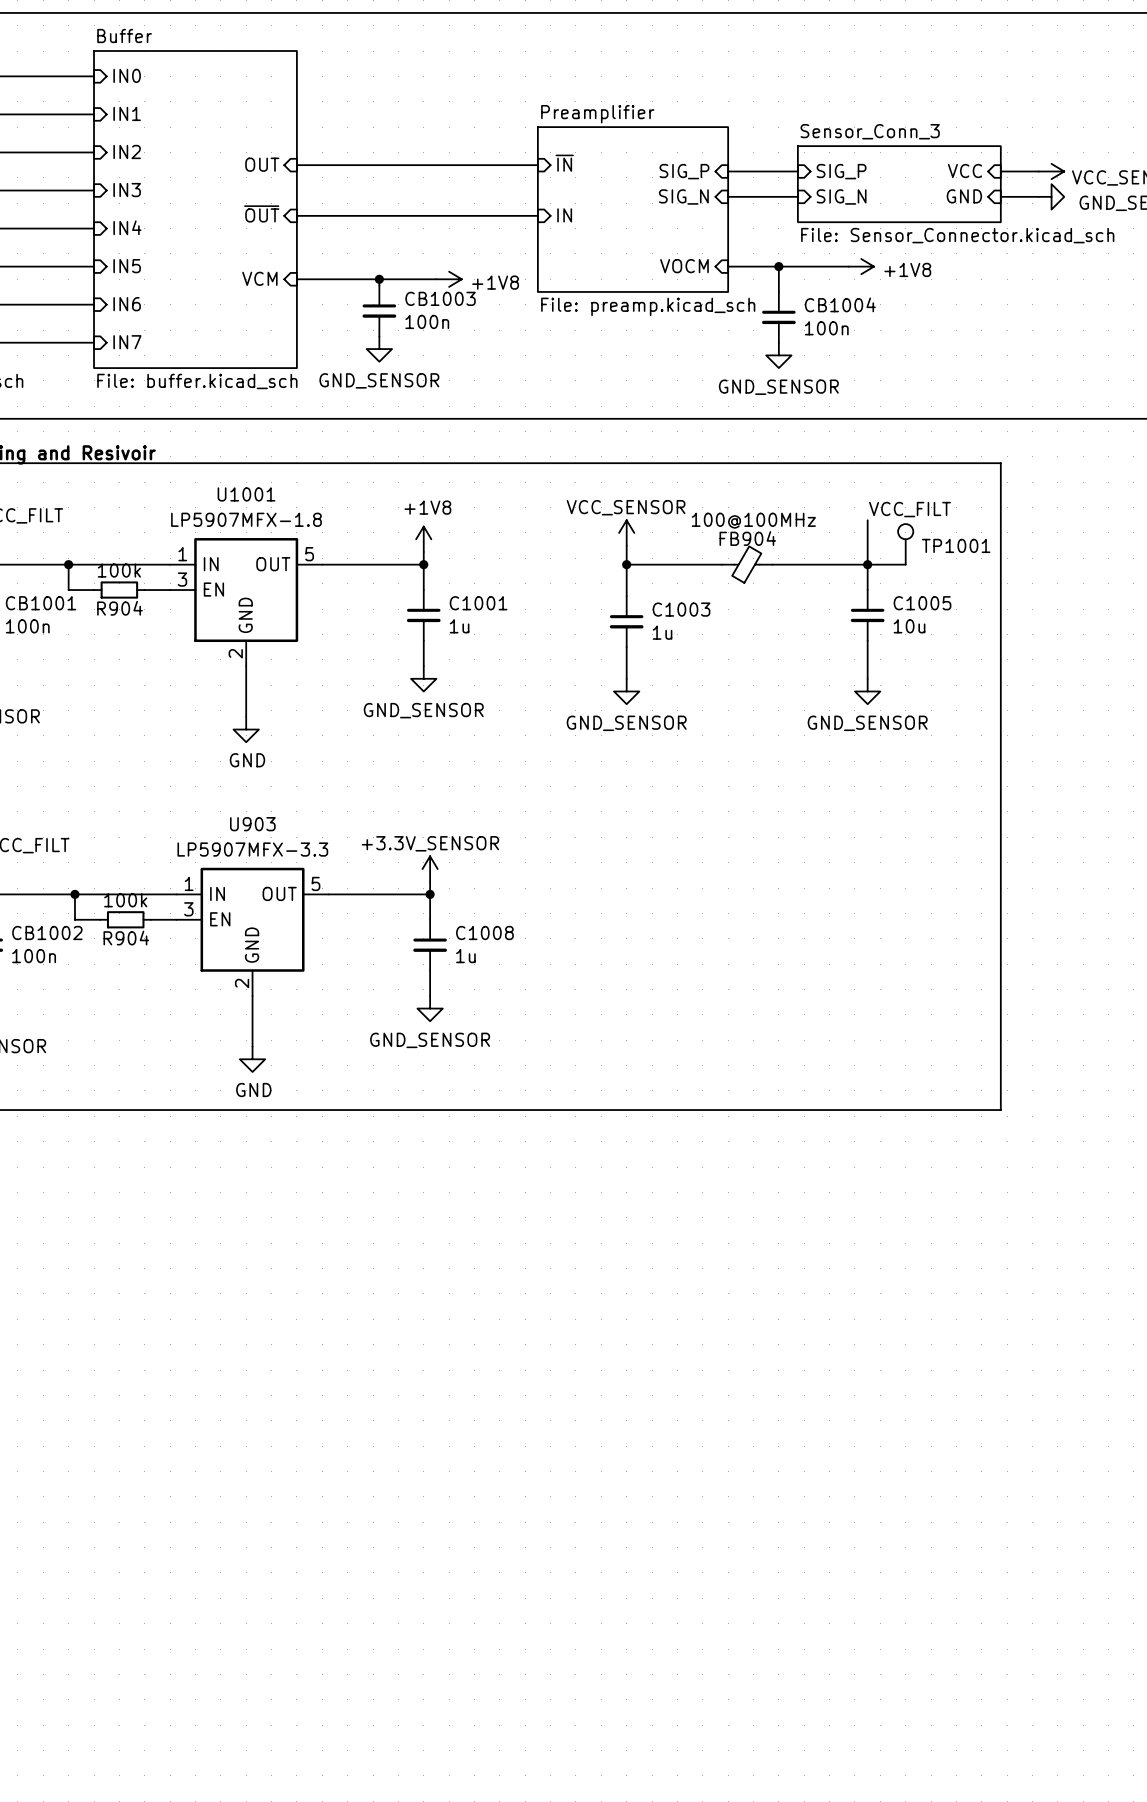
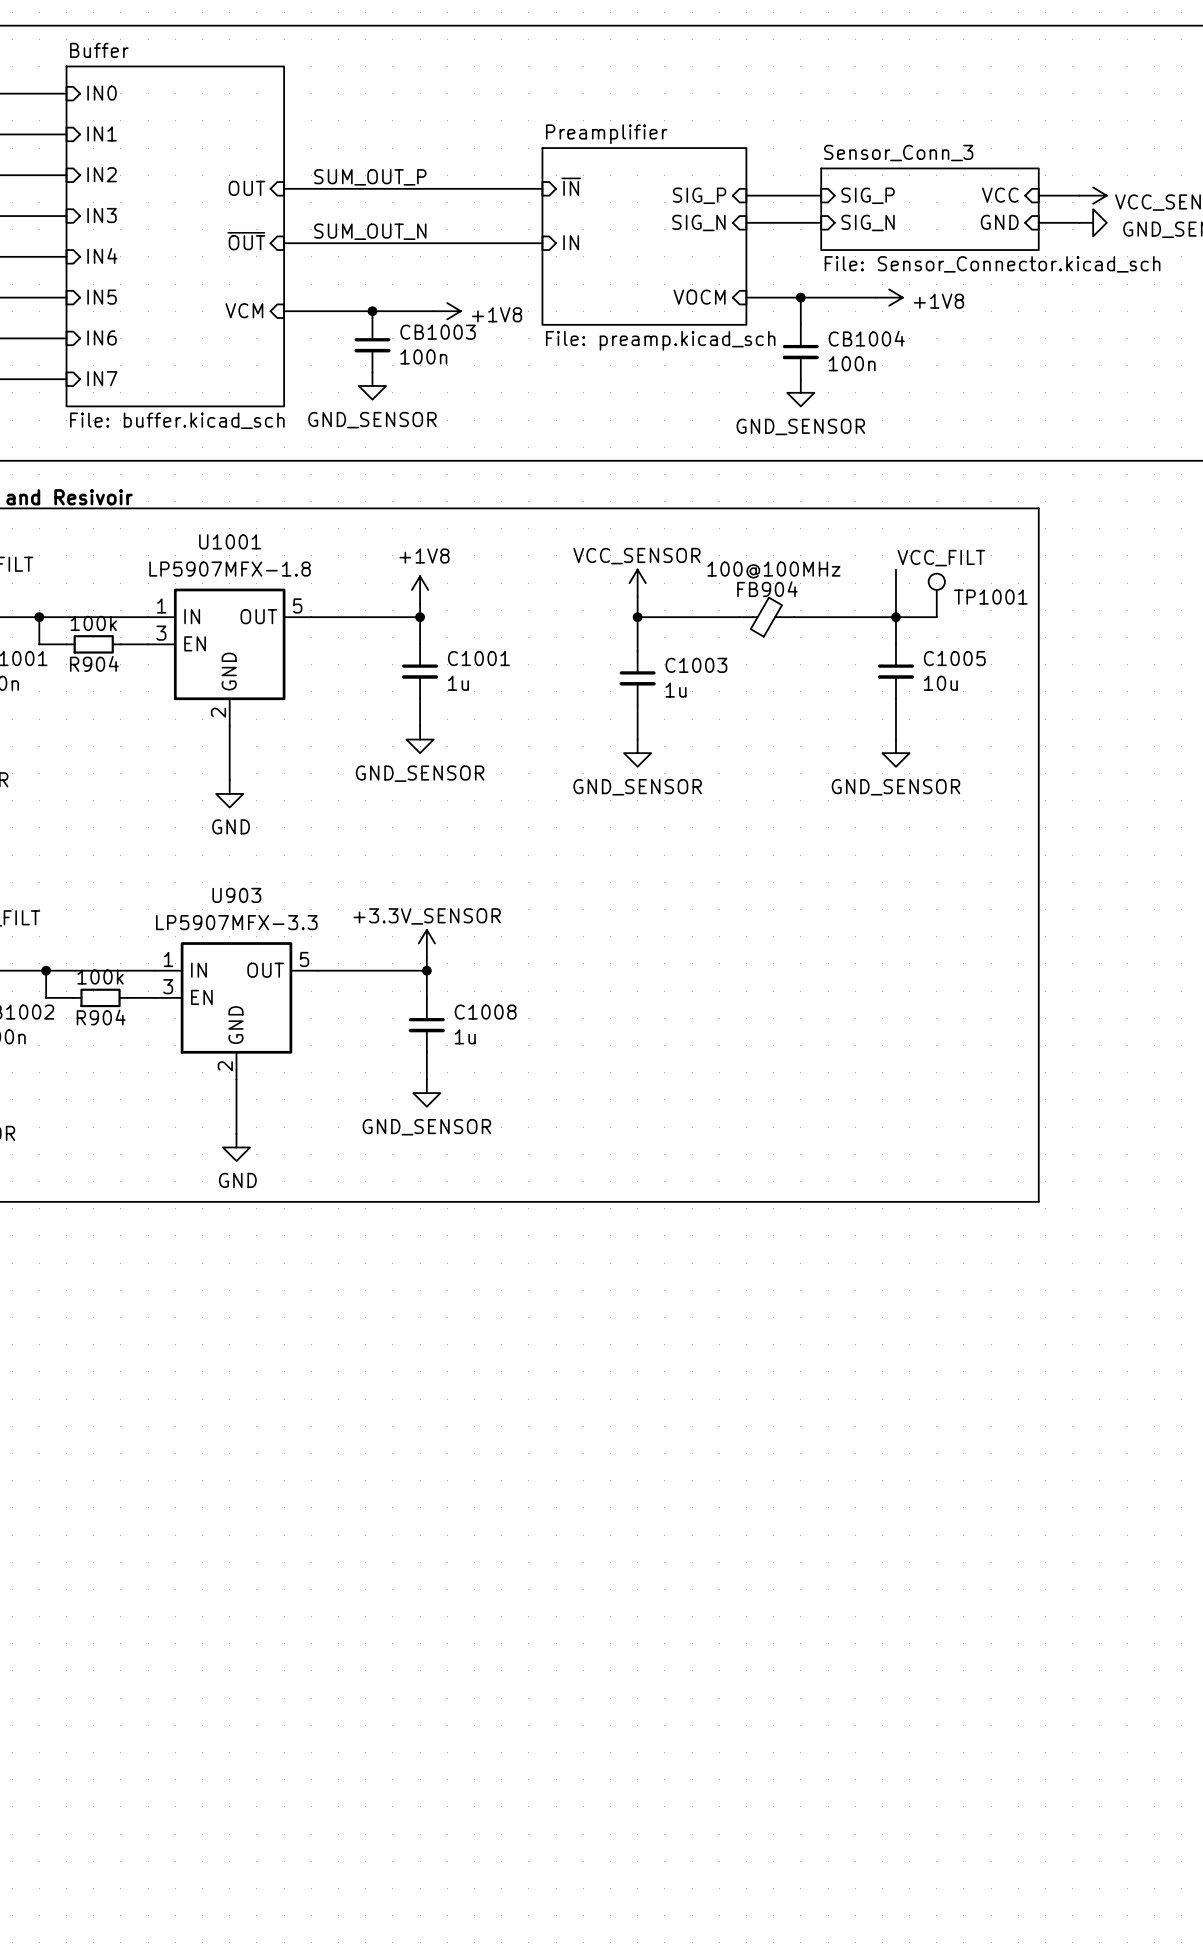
label: none -> SUM_OUT_P (370, 177)
label: none -> SUM_OUT_N (370, 231)

